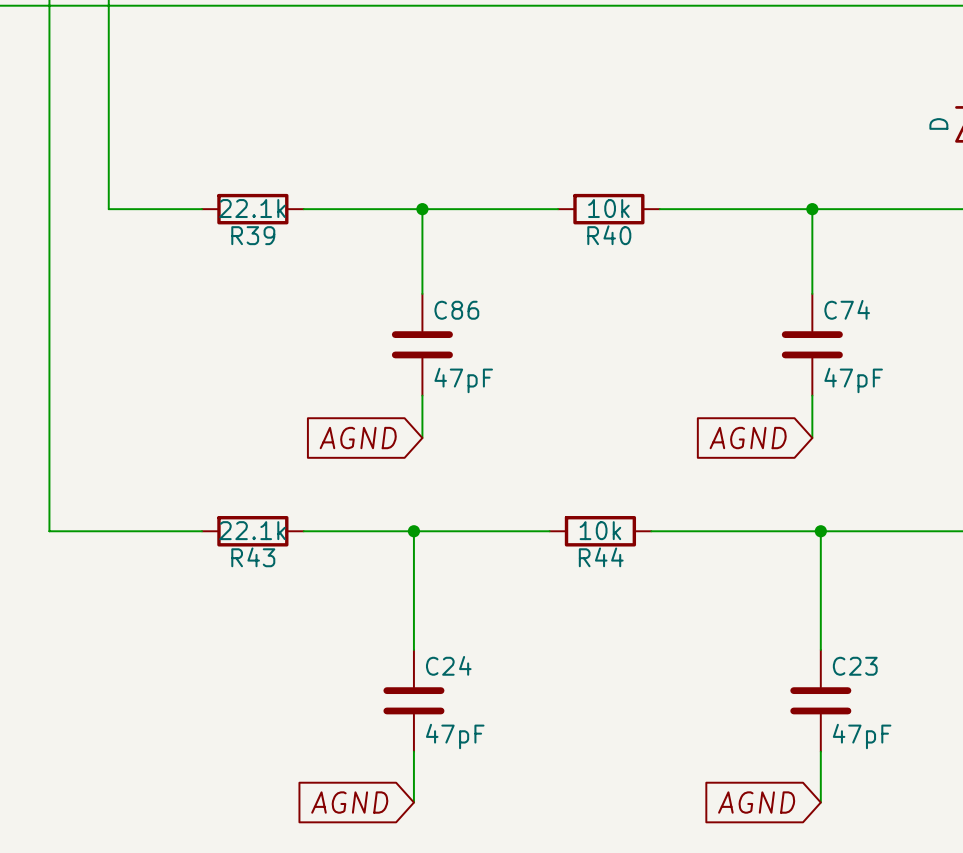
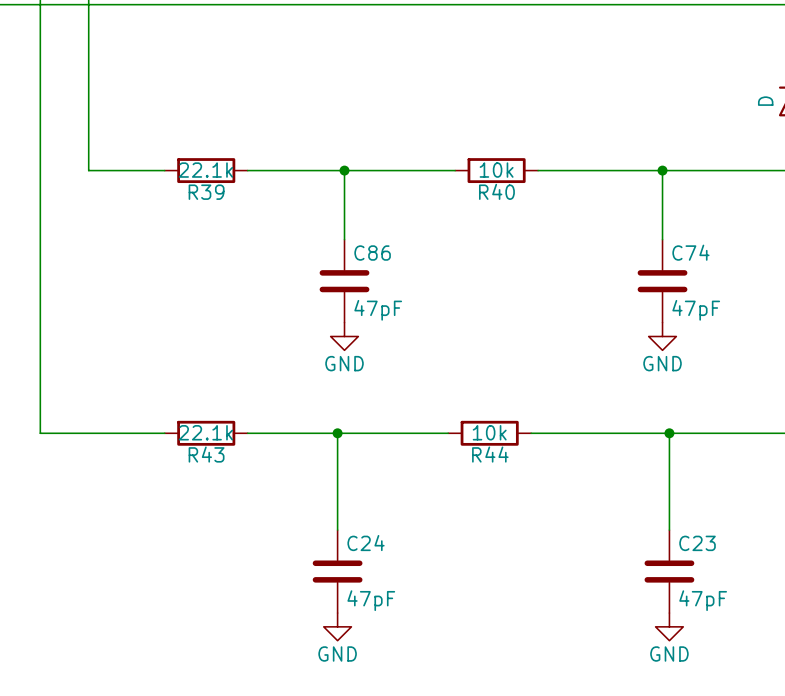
wire: (422, 395) (422, 438) -> none
wire: (812, 395) (812, 438) -> none
power symbol: none -> GND (344, 336)
power symbol: none -> GND (662, 336)
global label: AGND (358, 438) -> none
global label: AGND (748, 438) -> none
wire: (413, 751) (413, 802) -> none
wire: (820, 751) (820, 802) -> none
power symbol: none -> GND (337, 626)
power symbol: none -> GND (669, 626)
global label: AGND (349, 802) -> none
global label: AGND (756, 802) -> none

